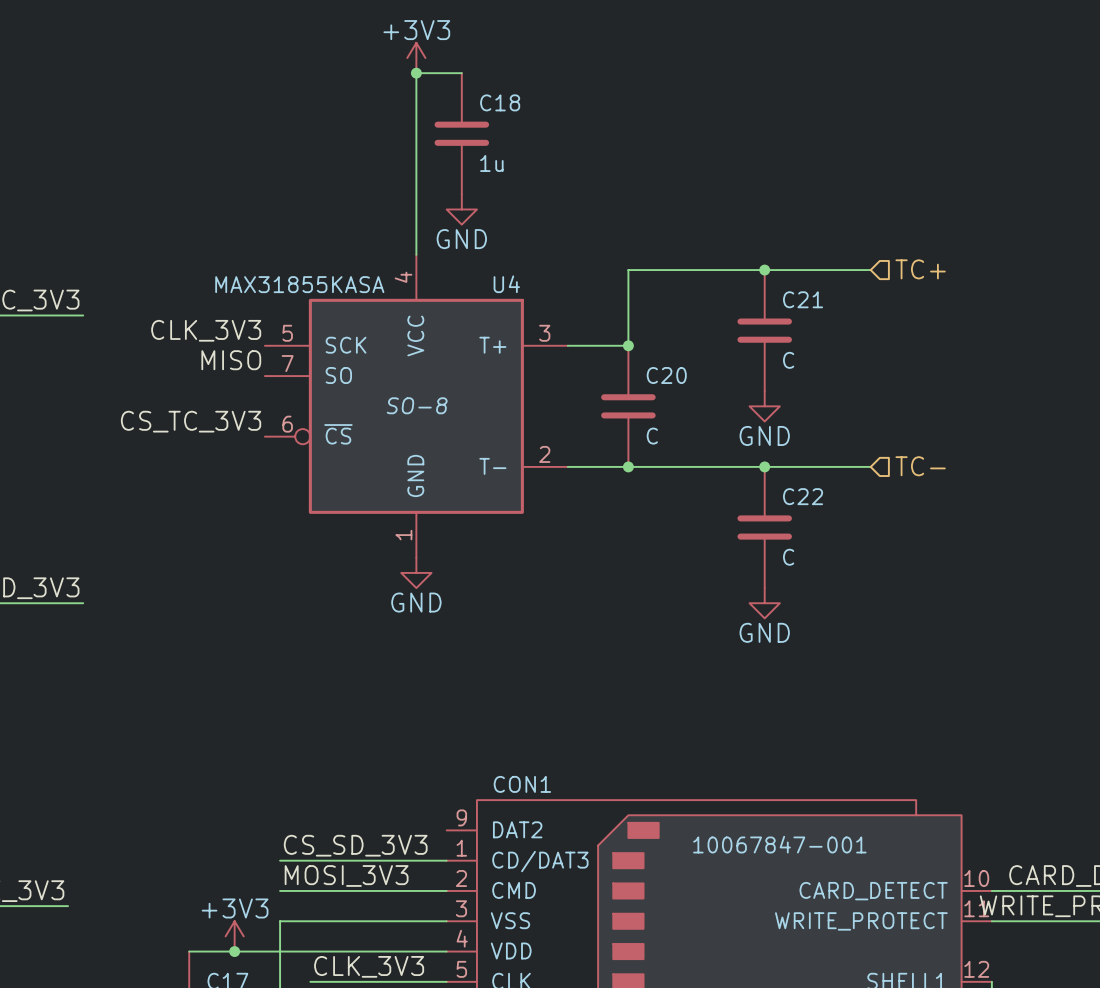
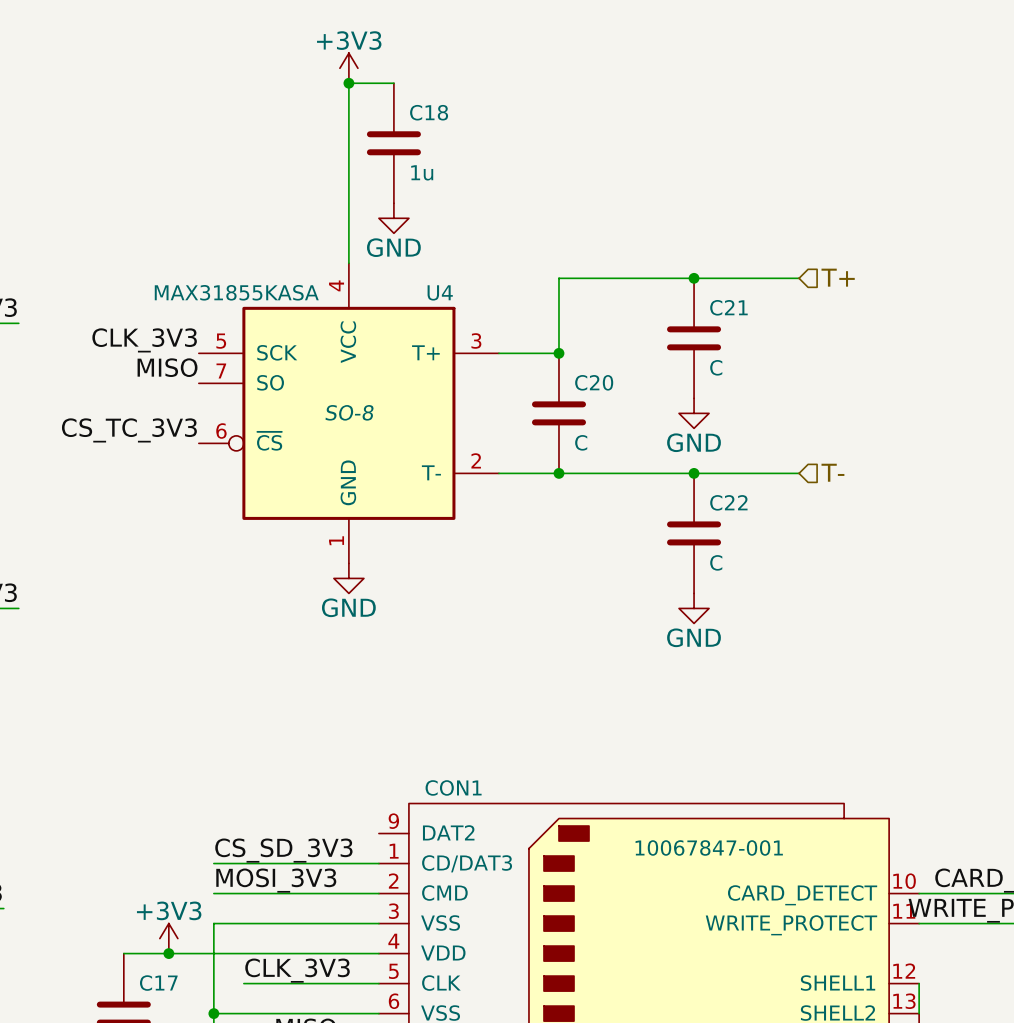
hierarchical label: TC+ (920, 269) -> T+ (838, 277)
hierarchical label: TC- (920, 466) -> T- (832, 472)

